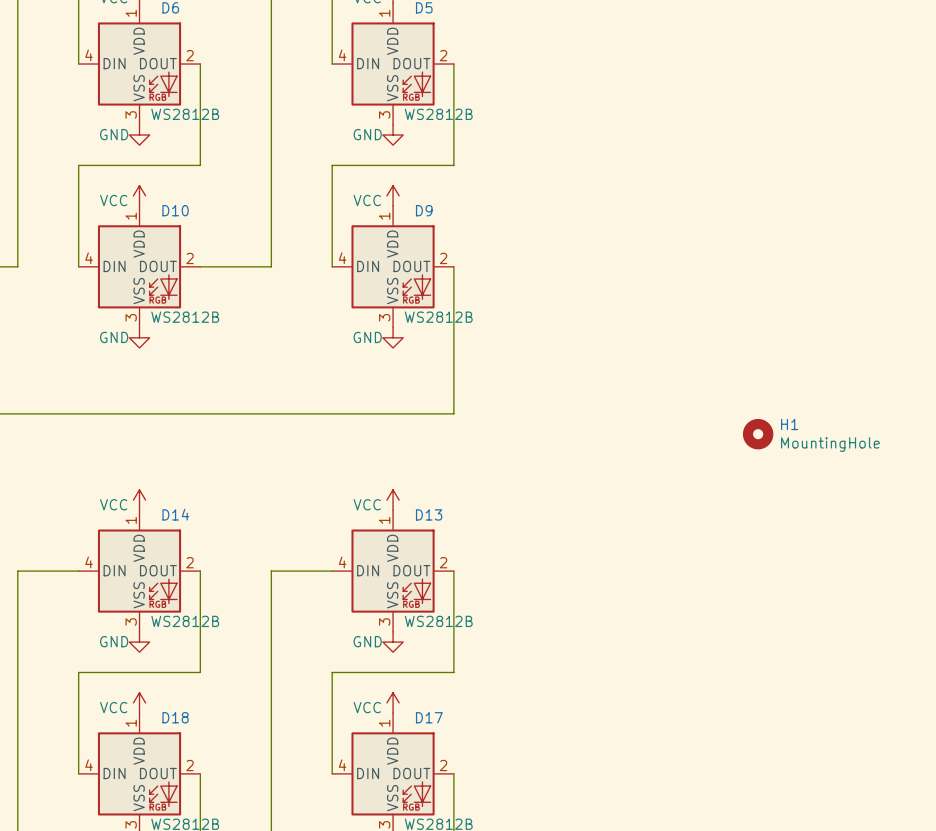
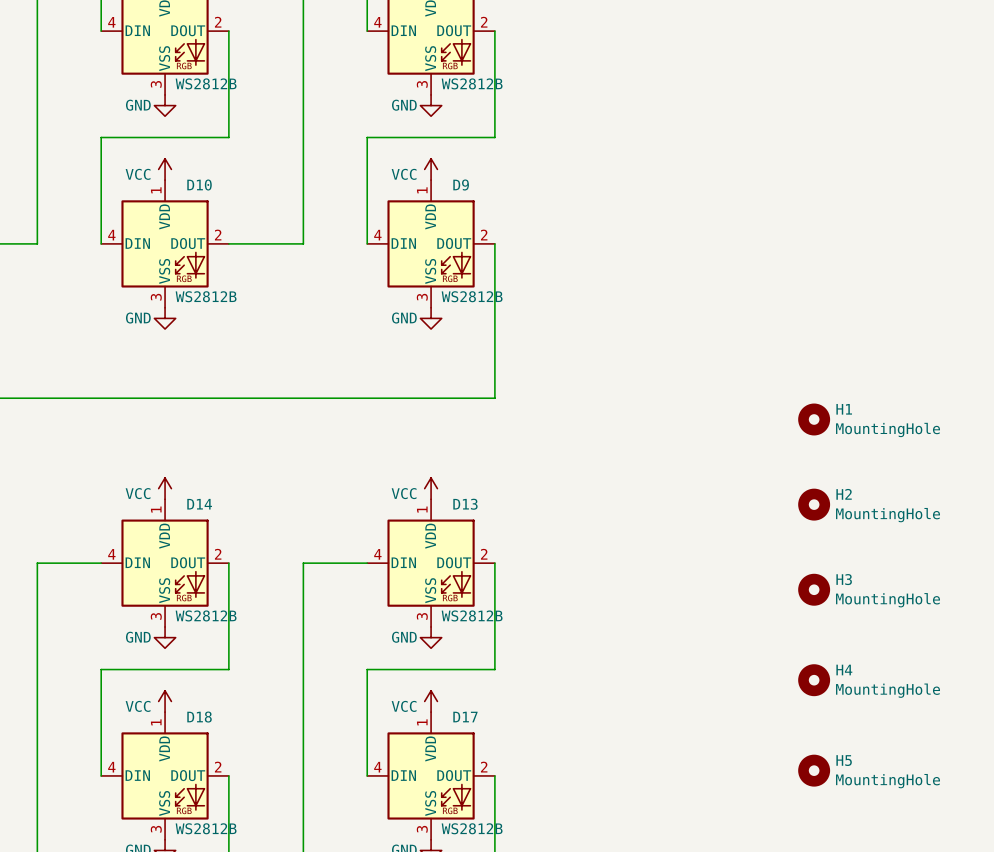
H2: none -> MountingHole (814, 504)
H3: none -> MountingHole (814, 589)
H4: none -> MountingHole (814, 680)
H5: none -> MountingHole (814, 770)

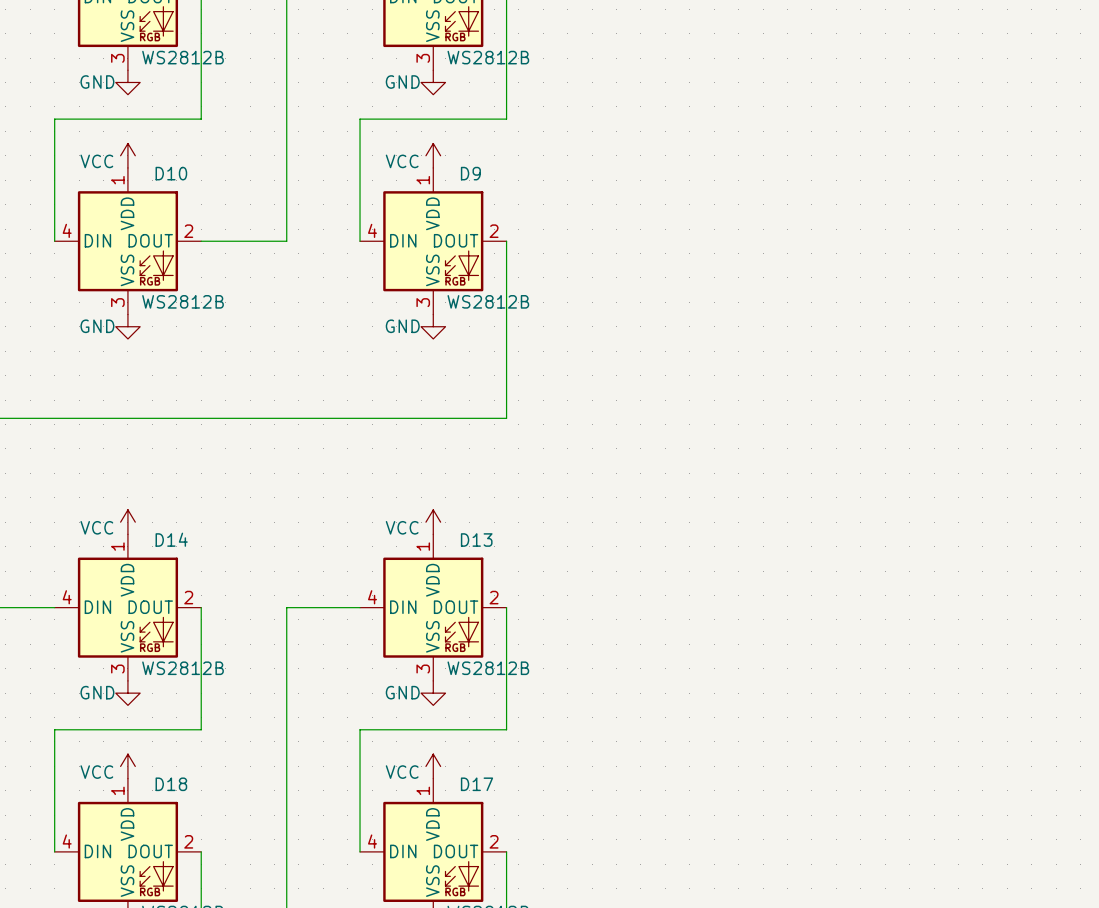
H1: MountingHole (814, 419) -> none
H2: MountingHole (814, 504) -> none
H3: MountingHole (814, 589) -> none
H4: MountingHole (814, 680) -> none
H5: MountingHole (814, 770) -> none

